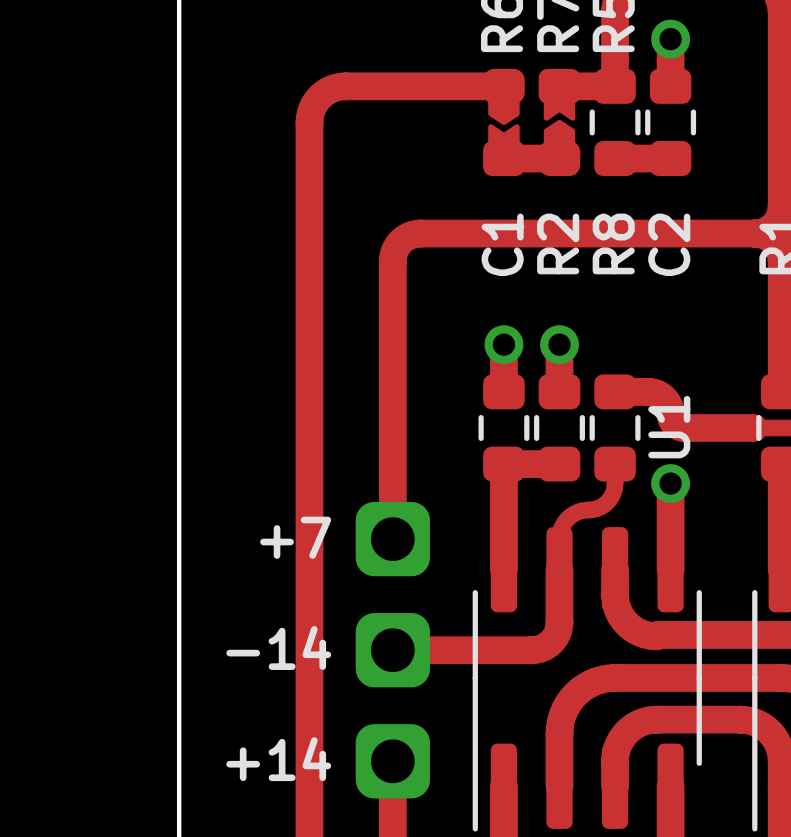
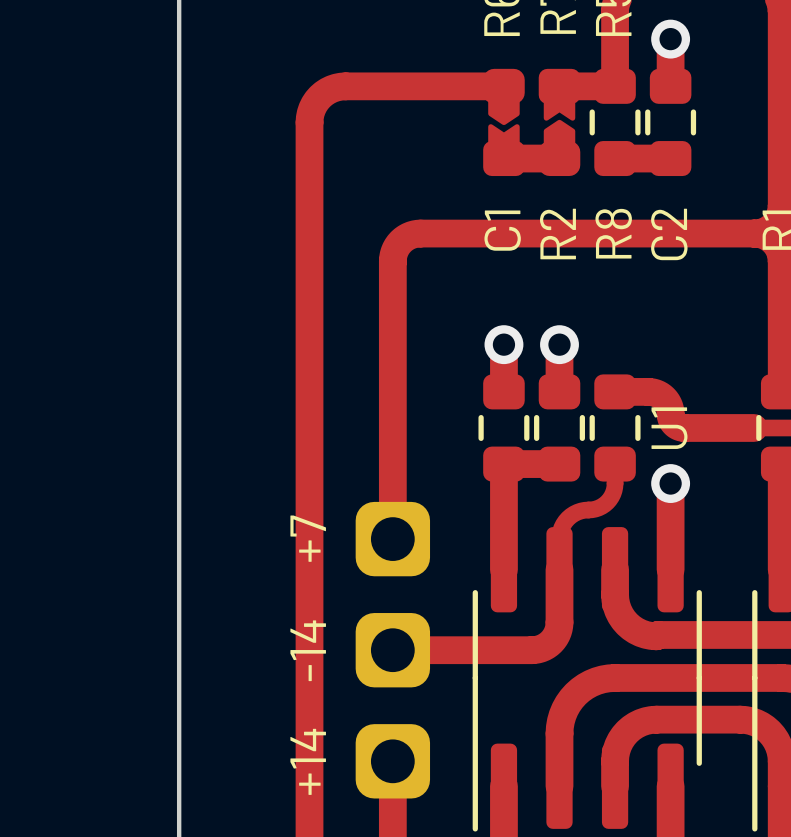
text rotation: 0° (295, 537) -> 90° counterclockwise (308, 538)
text rotation: 0° (278, 648) -> 90° counterclockwise (308, 650)
text rotation: 0° (278, 759) -> 90° counterclockwise (308, 761)

